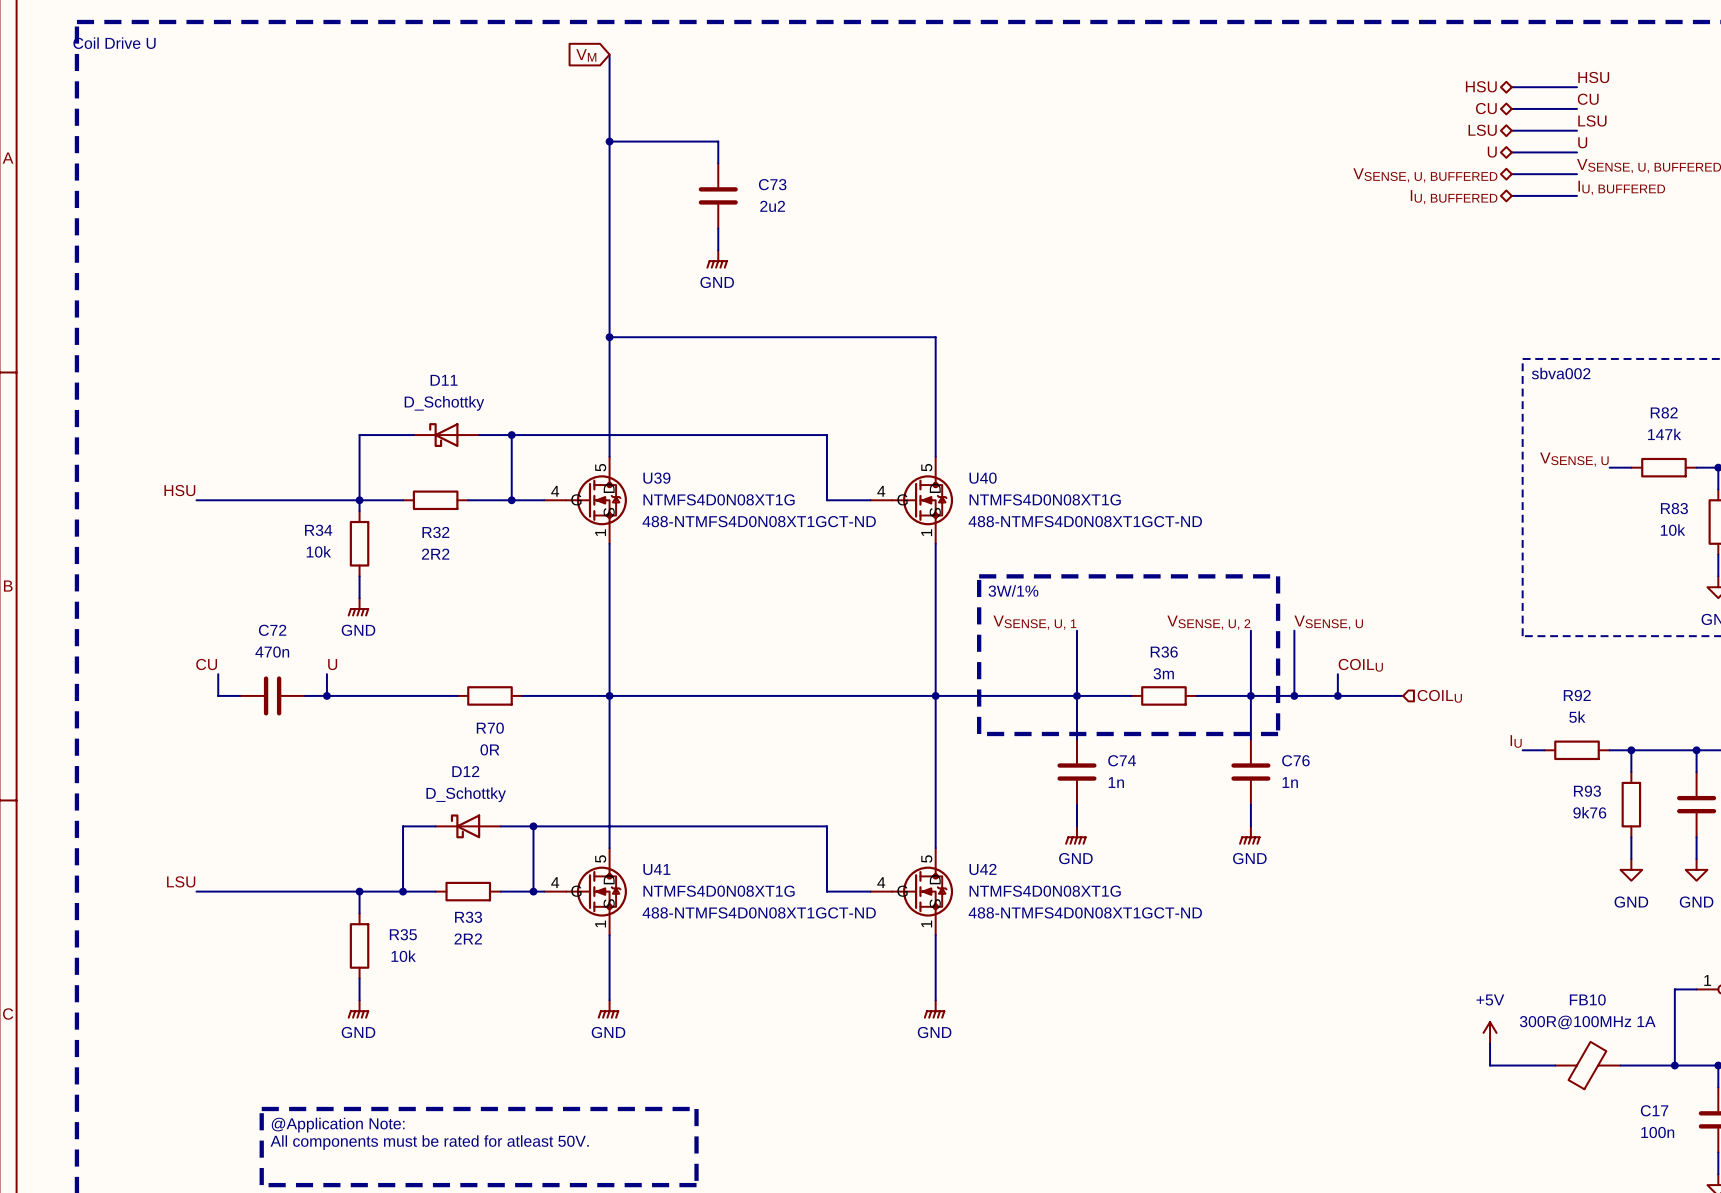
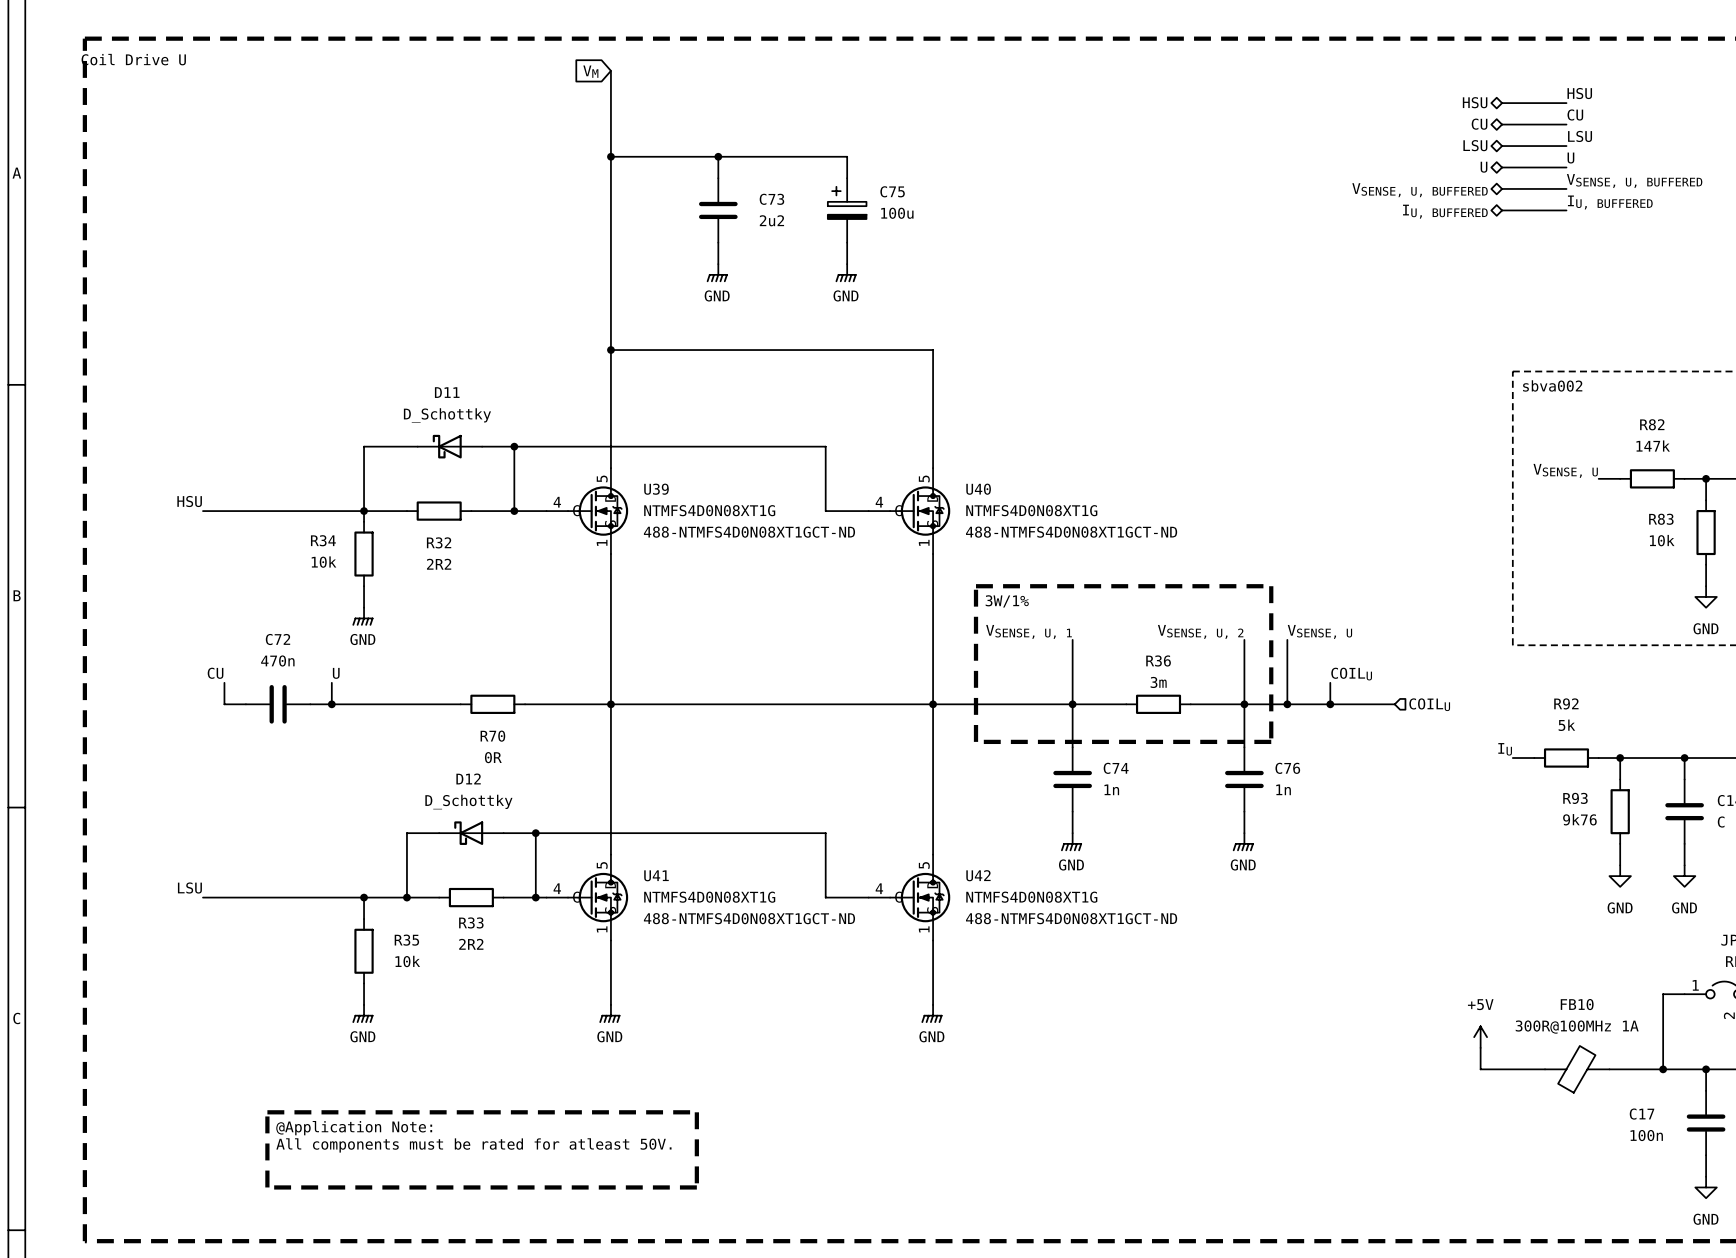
wire: none -> (718, 156) (847, 156) (847, 178)
junction: none -> (718, 156)
C75: none -> 100u (847, 210)
wire: none -> (847, 242) (847, 264)
power symbol: none -> GND (846, 273)

